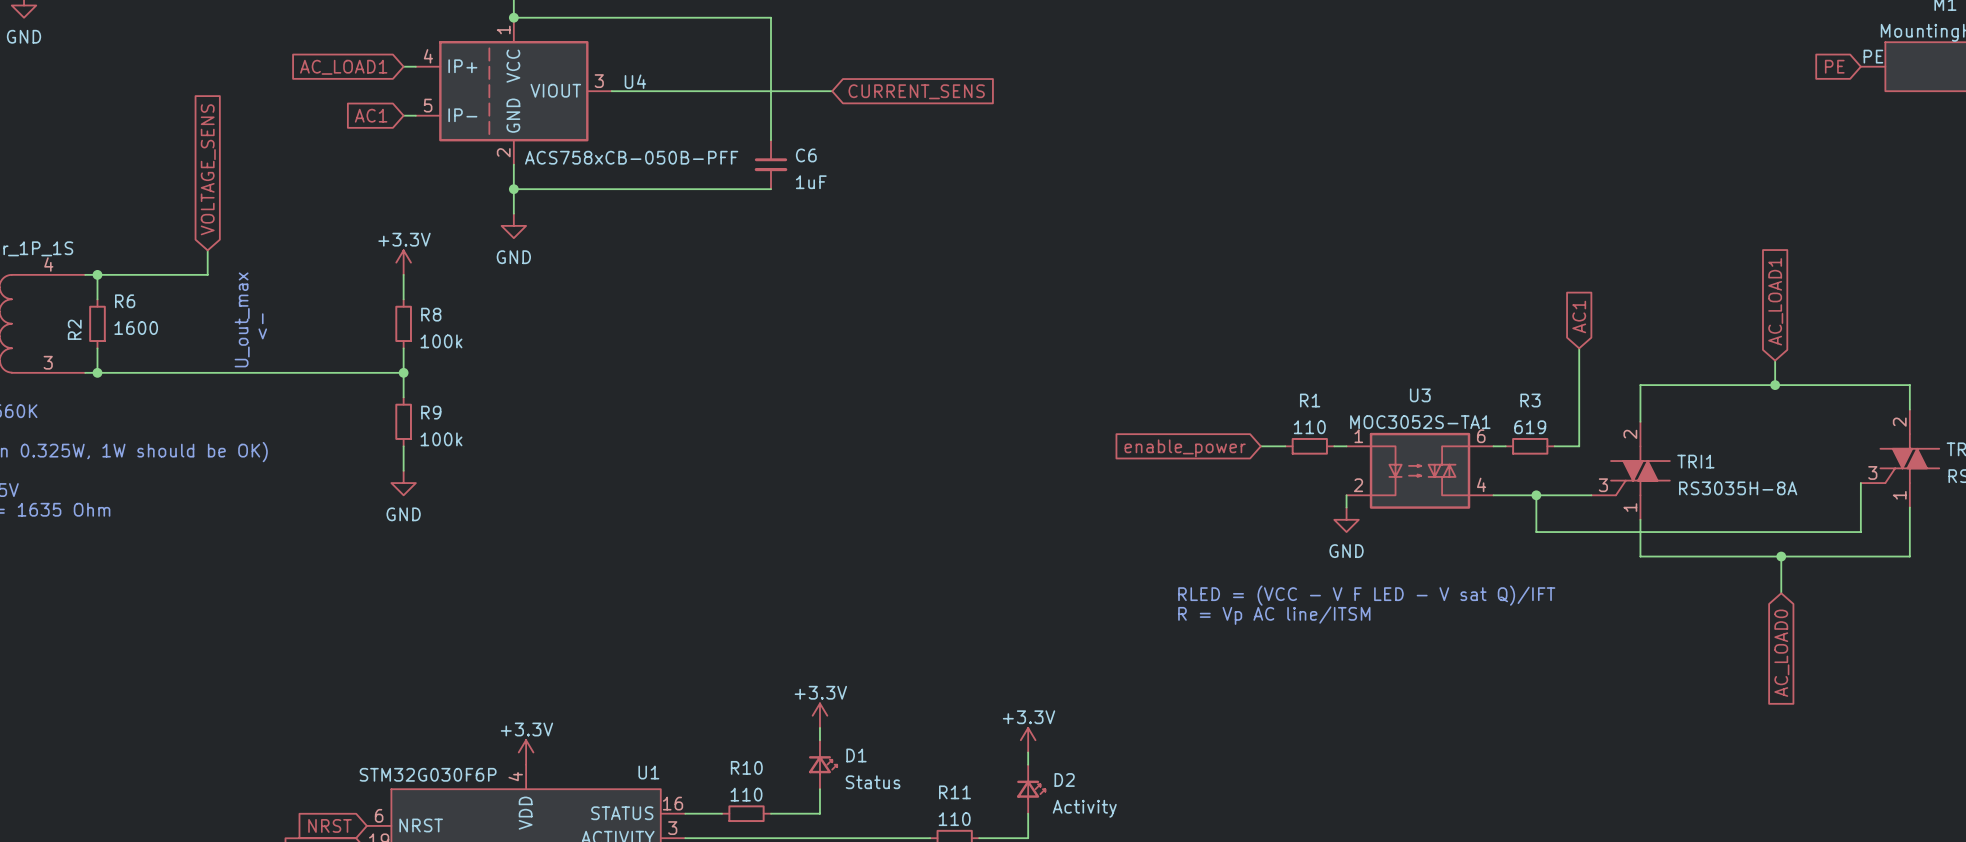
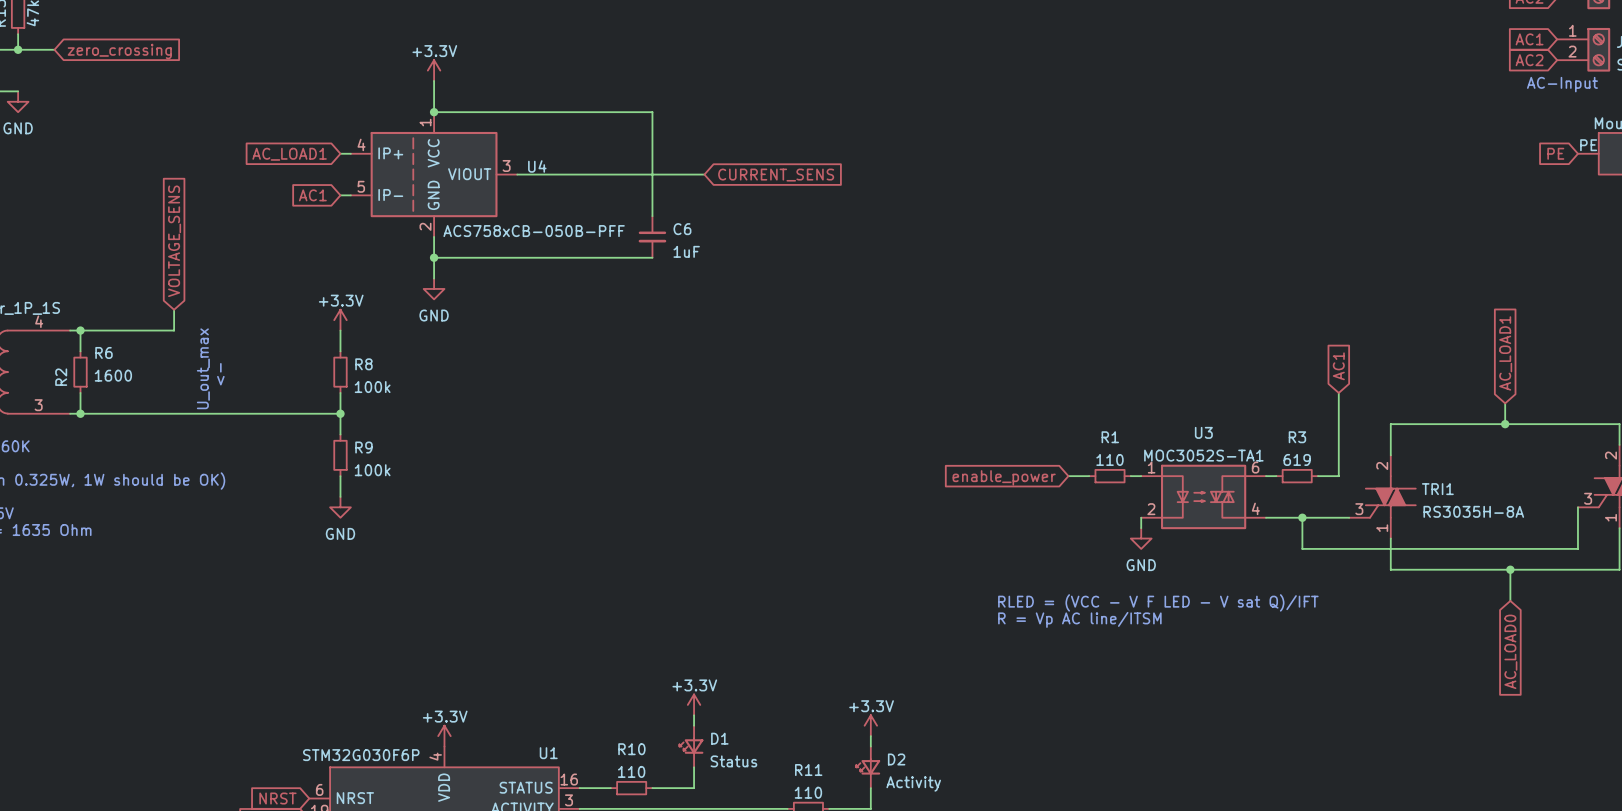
D1 rotation: 0° (823, 765) -> 180° (691, 746)
D2 rotation: 0° (1031, 789) -> 180° (868, 766)

